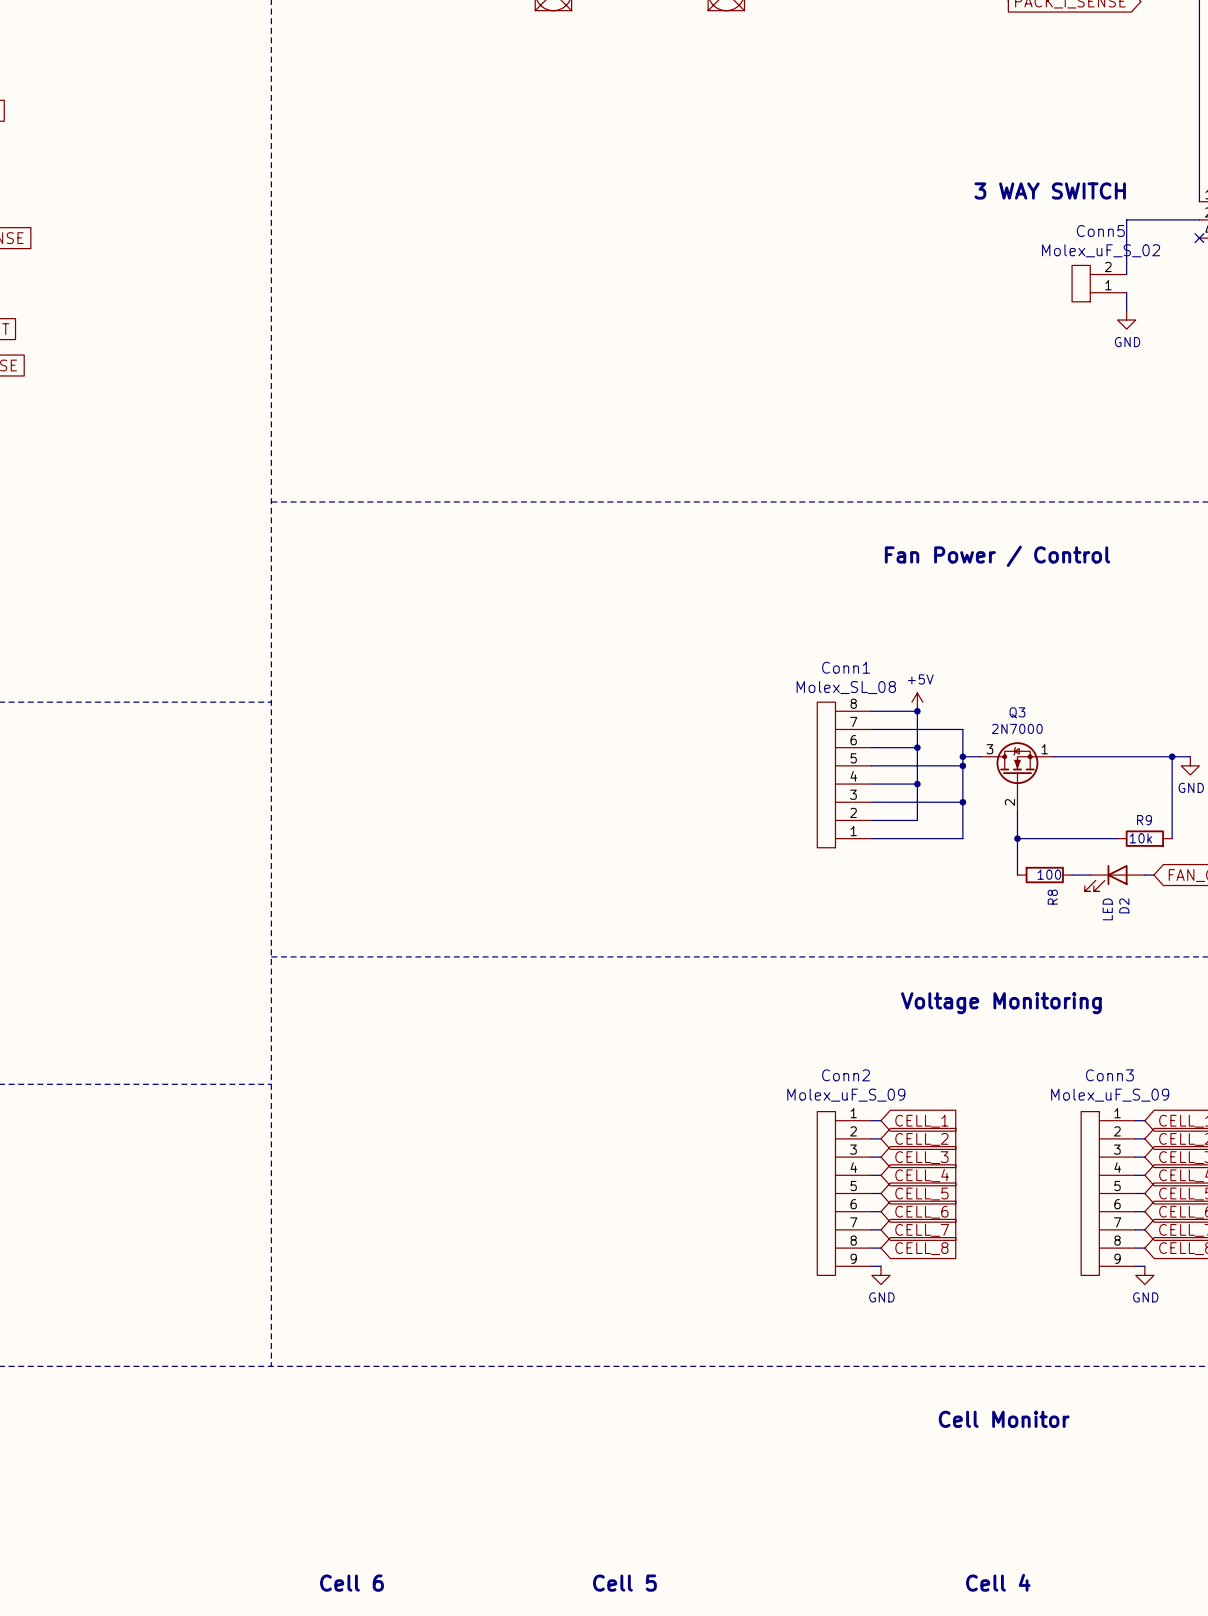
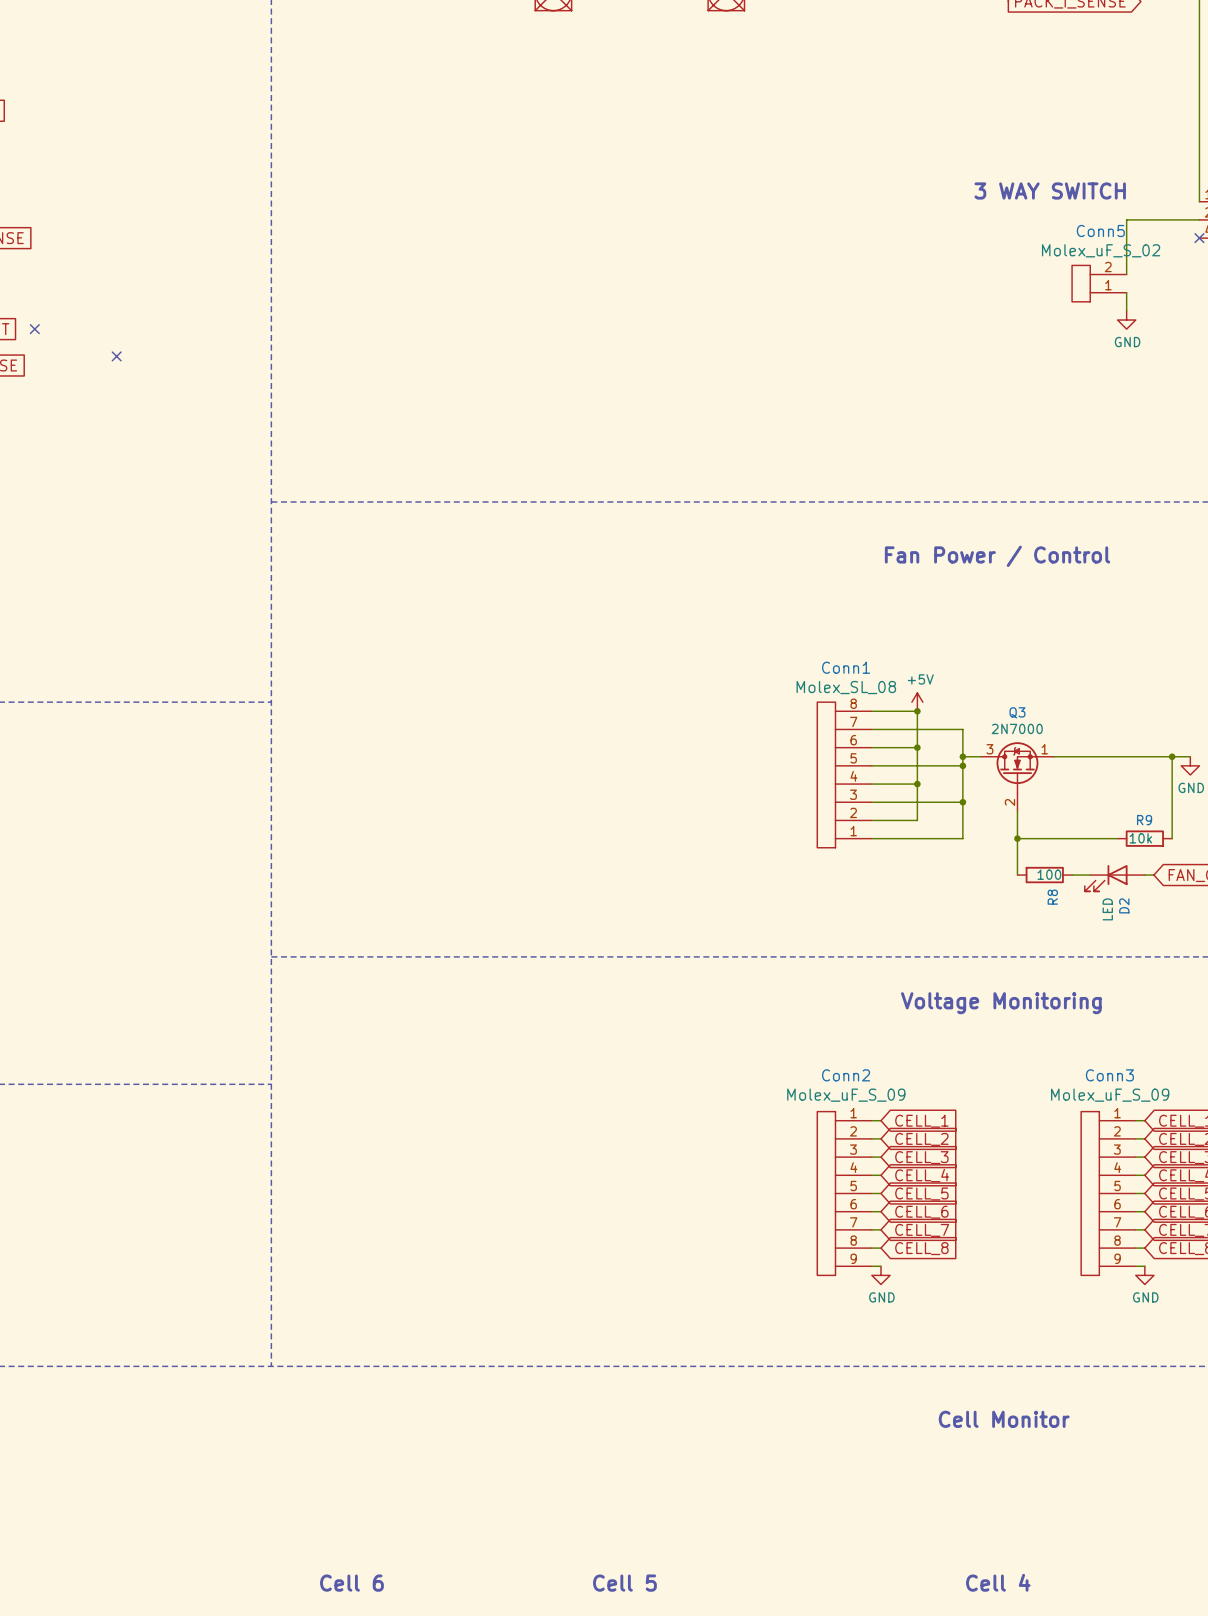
no-connect mark: none -> (34, 329)
no-connect mark: none -> (116, 356)

